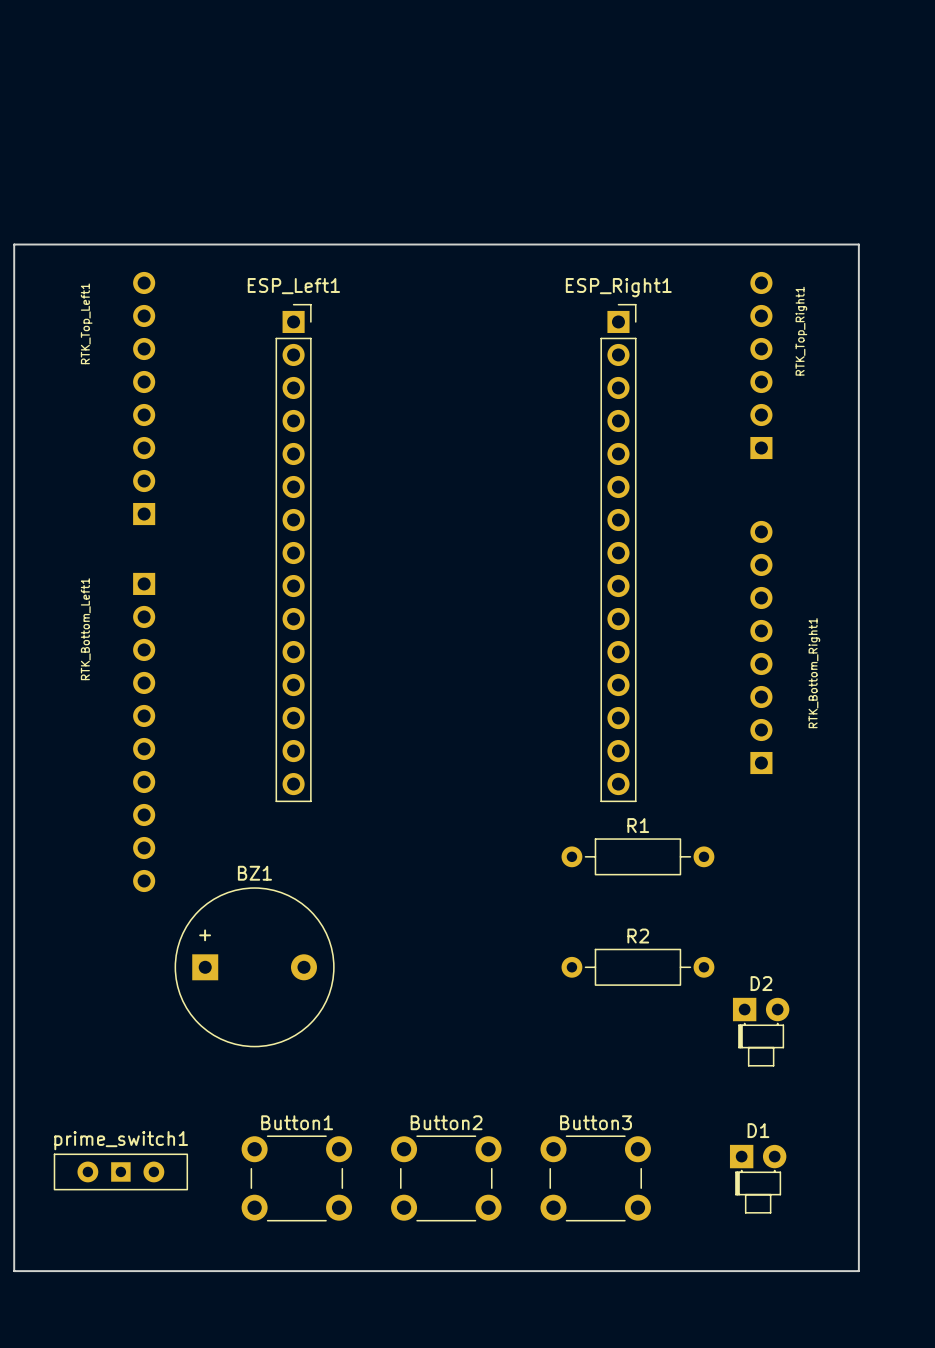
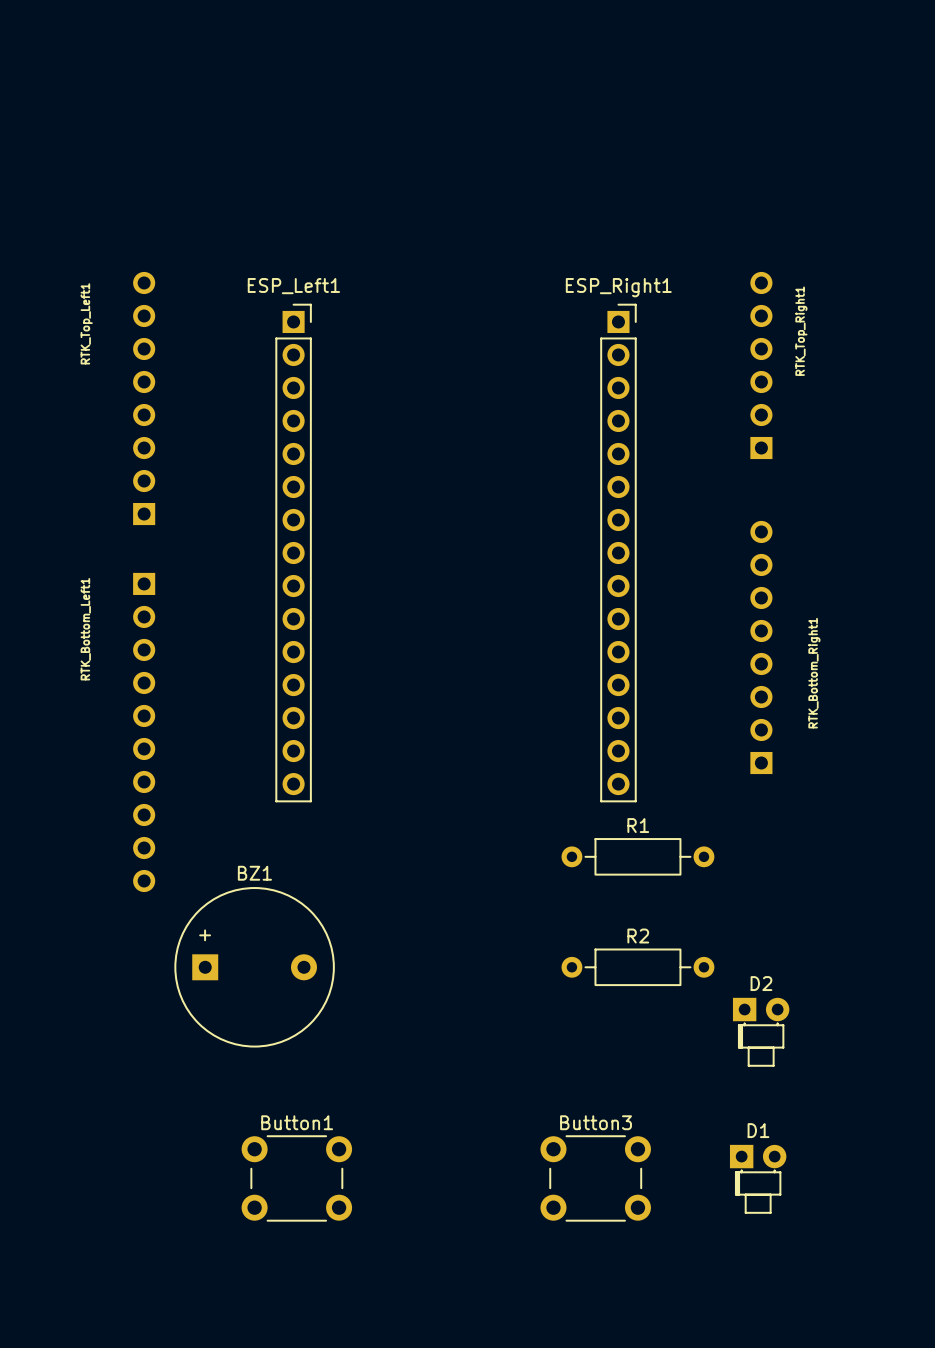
board edge: (14, 244) (858, 244) (858, 1271) (14, 1271) (14, 244) -> none
prime_switch1: (120, 1171) -> none
Button2: (446, 1178) -> none

